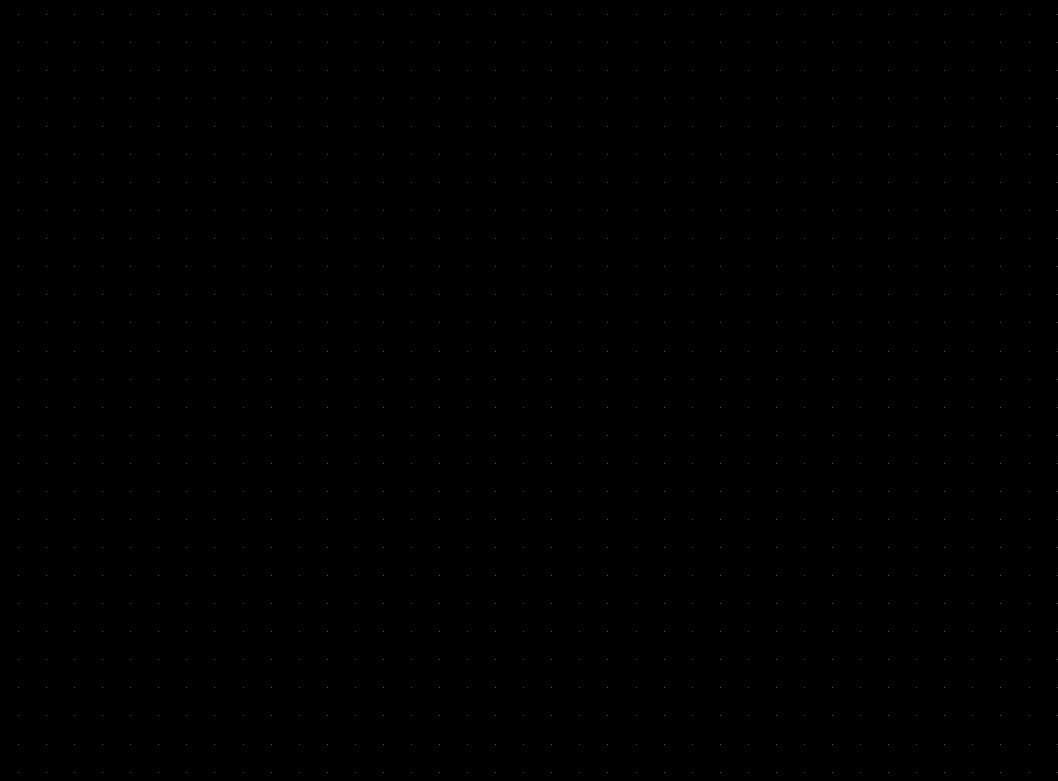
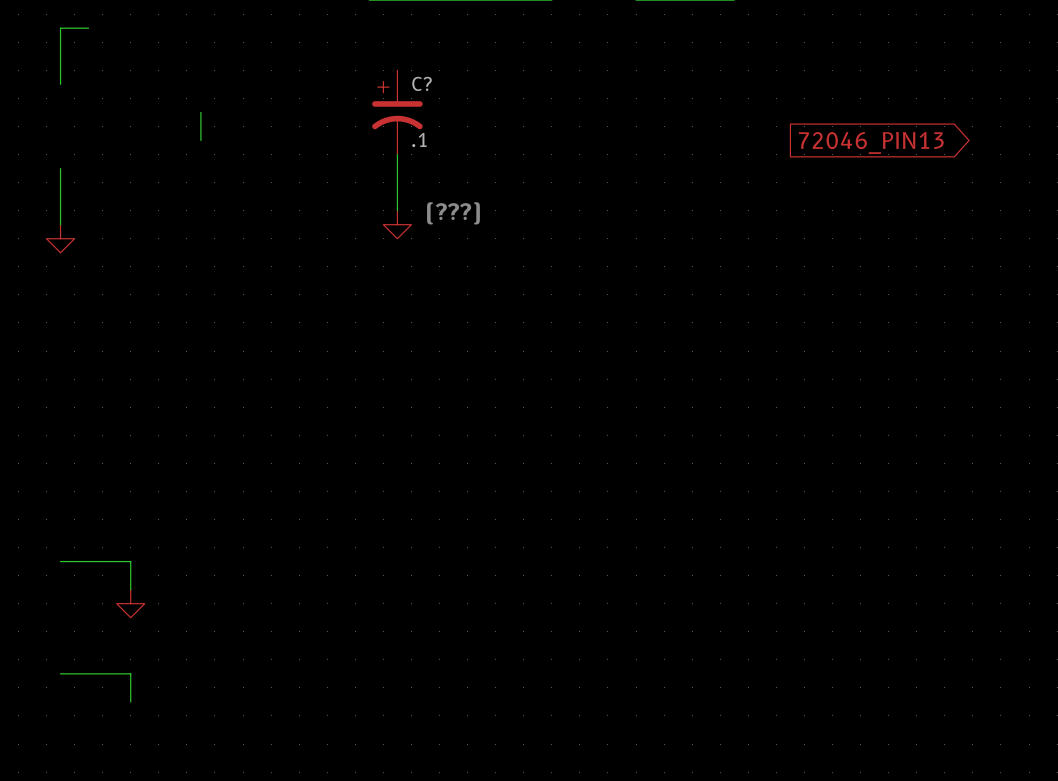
wire: none -> (369, 0) (551, 0)
wire: none -> (636, 0) (734, 0)
wire: none -> (88, 28) (60, 28) (60, 84)
wire: none -> (200, 112) (200, 140)
C?: none -> .1 (397, 112)
global label: none -> 72046_PIN13 (871, 142)
wire: none -> (397, 154) (397, 210)
wire: none -> (60, 168) (60, 224)
text: none -> (???) (453, 213)
power symbol: none -> (397, 224)
power symbol: none -> (60, 238)
wire: none -> (60, 561) (130, 561) (130, 589)
power symbol: none -> (130, 603)
wire: none -> (60, 673) (130, 673) (130, 701)

